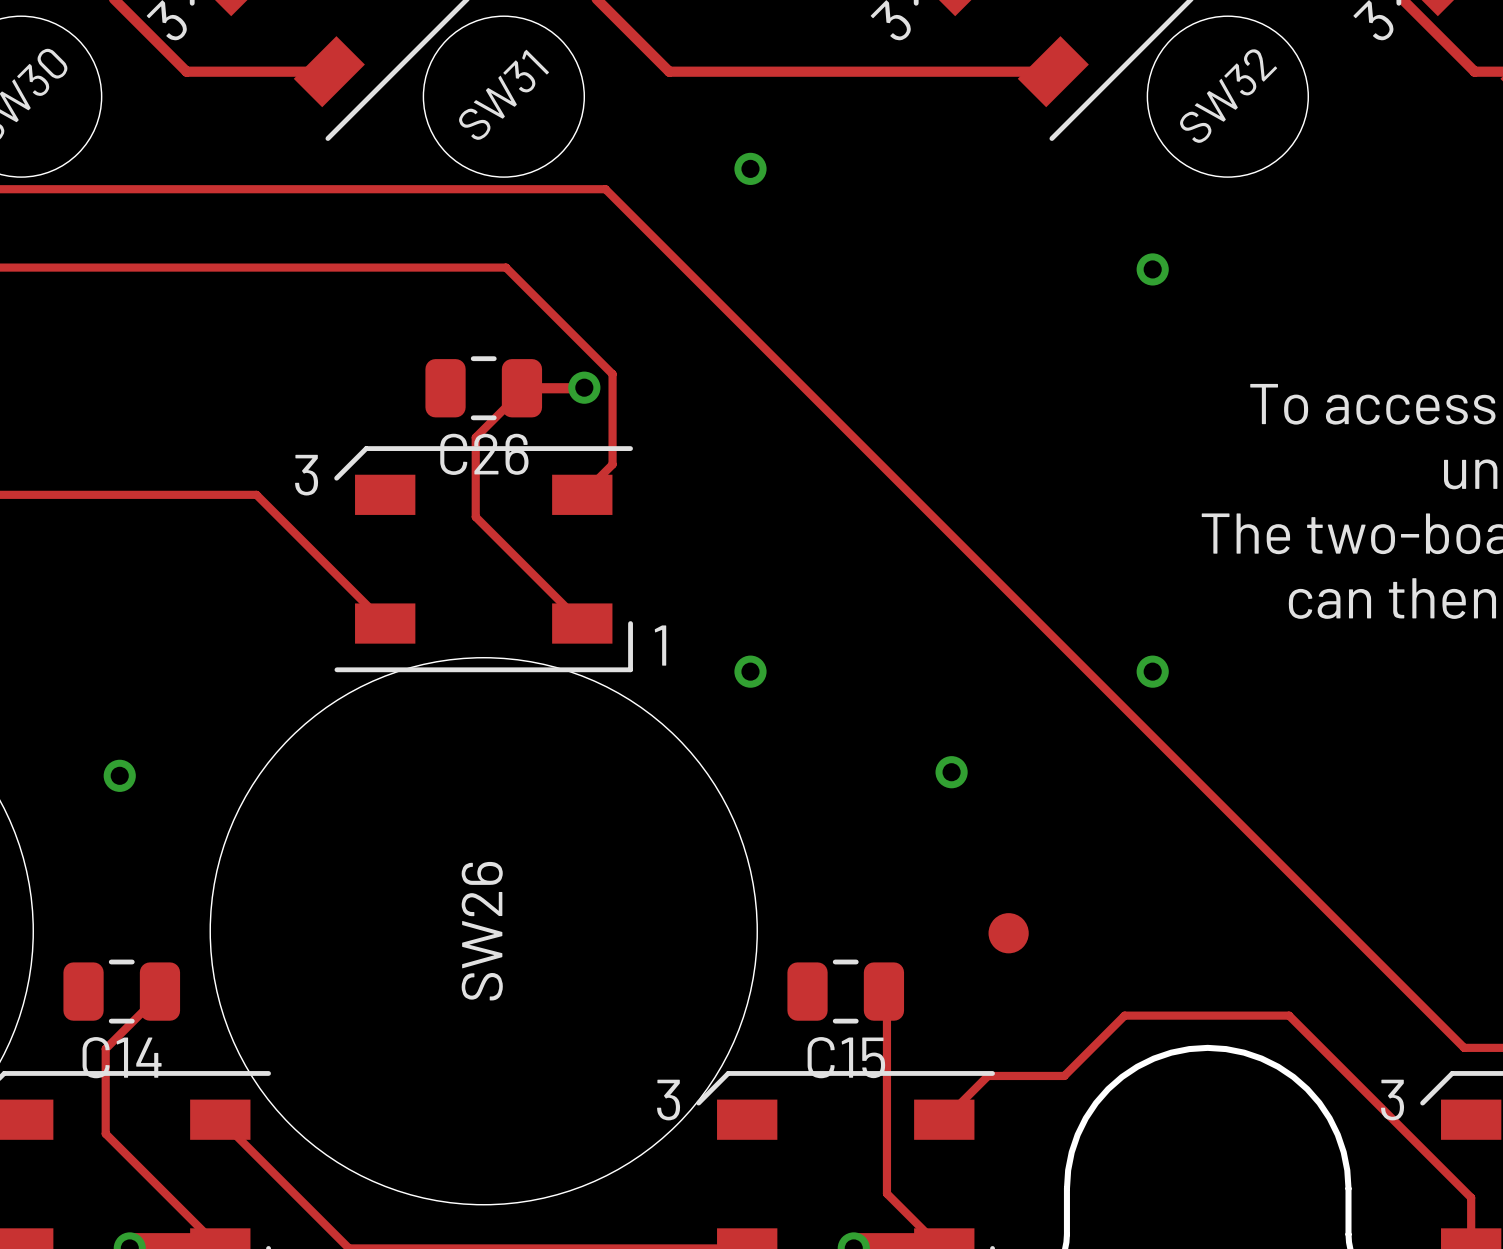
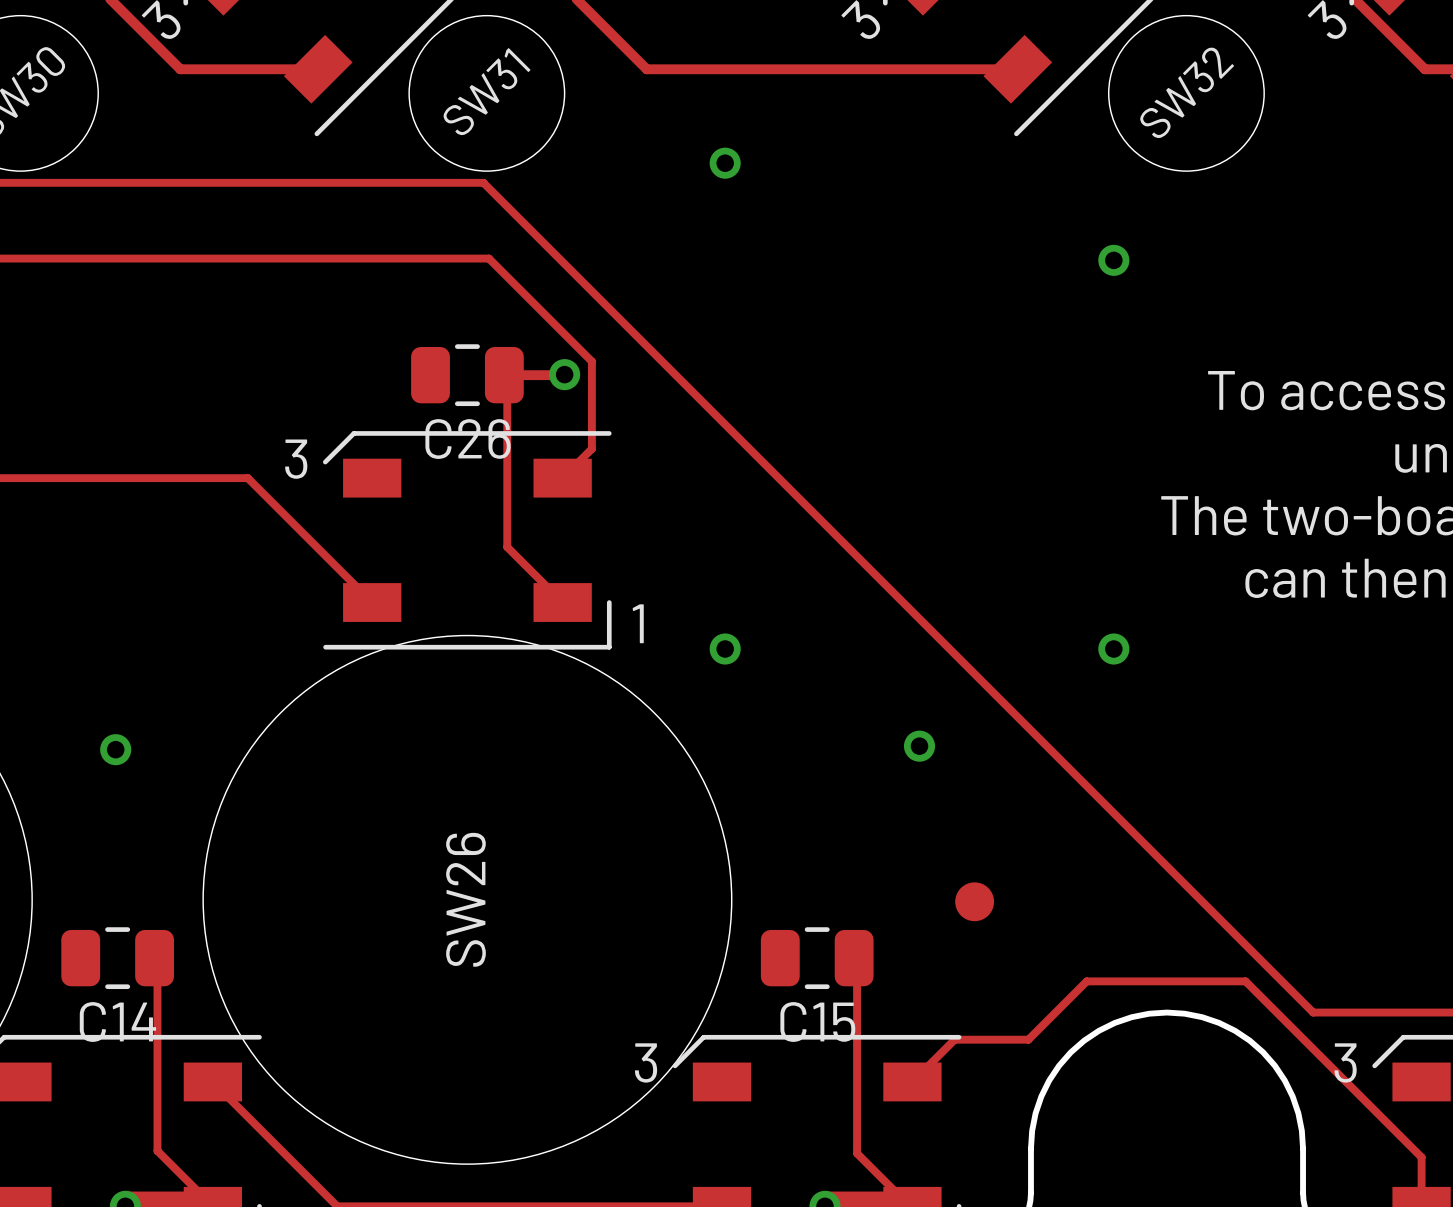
track: (500, 189) (605, 189) (1464, 1047) -> (483, 182) (1313, 1012) (1414, 1012)
track: (524, 388) (475, 437) (475, 516) (524, 566) -> (507, 375) (507, 547)
track: (162, 991) (105, 1048) (105, 1133) (162, 1191) -> (157, 958) (157, 1150)

